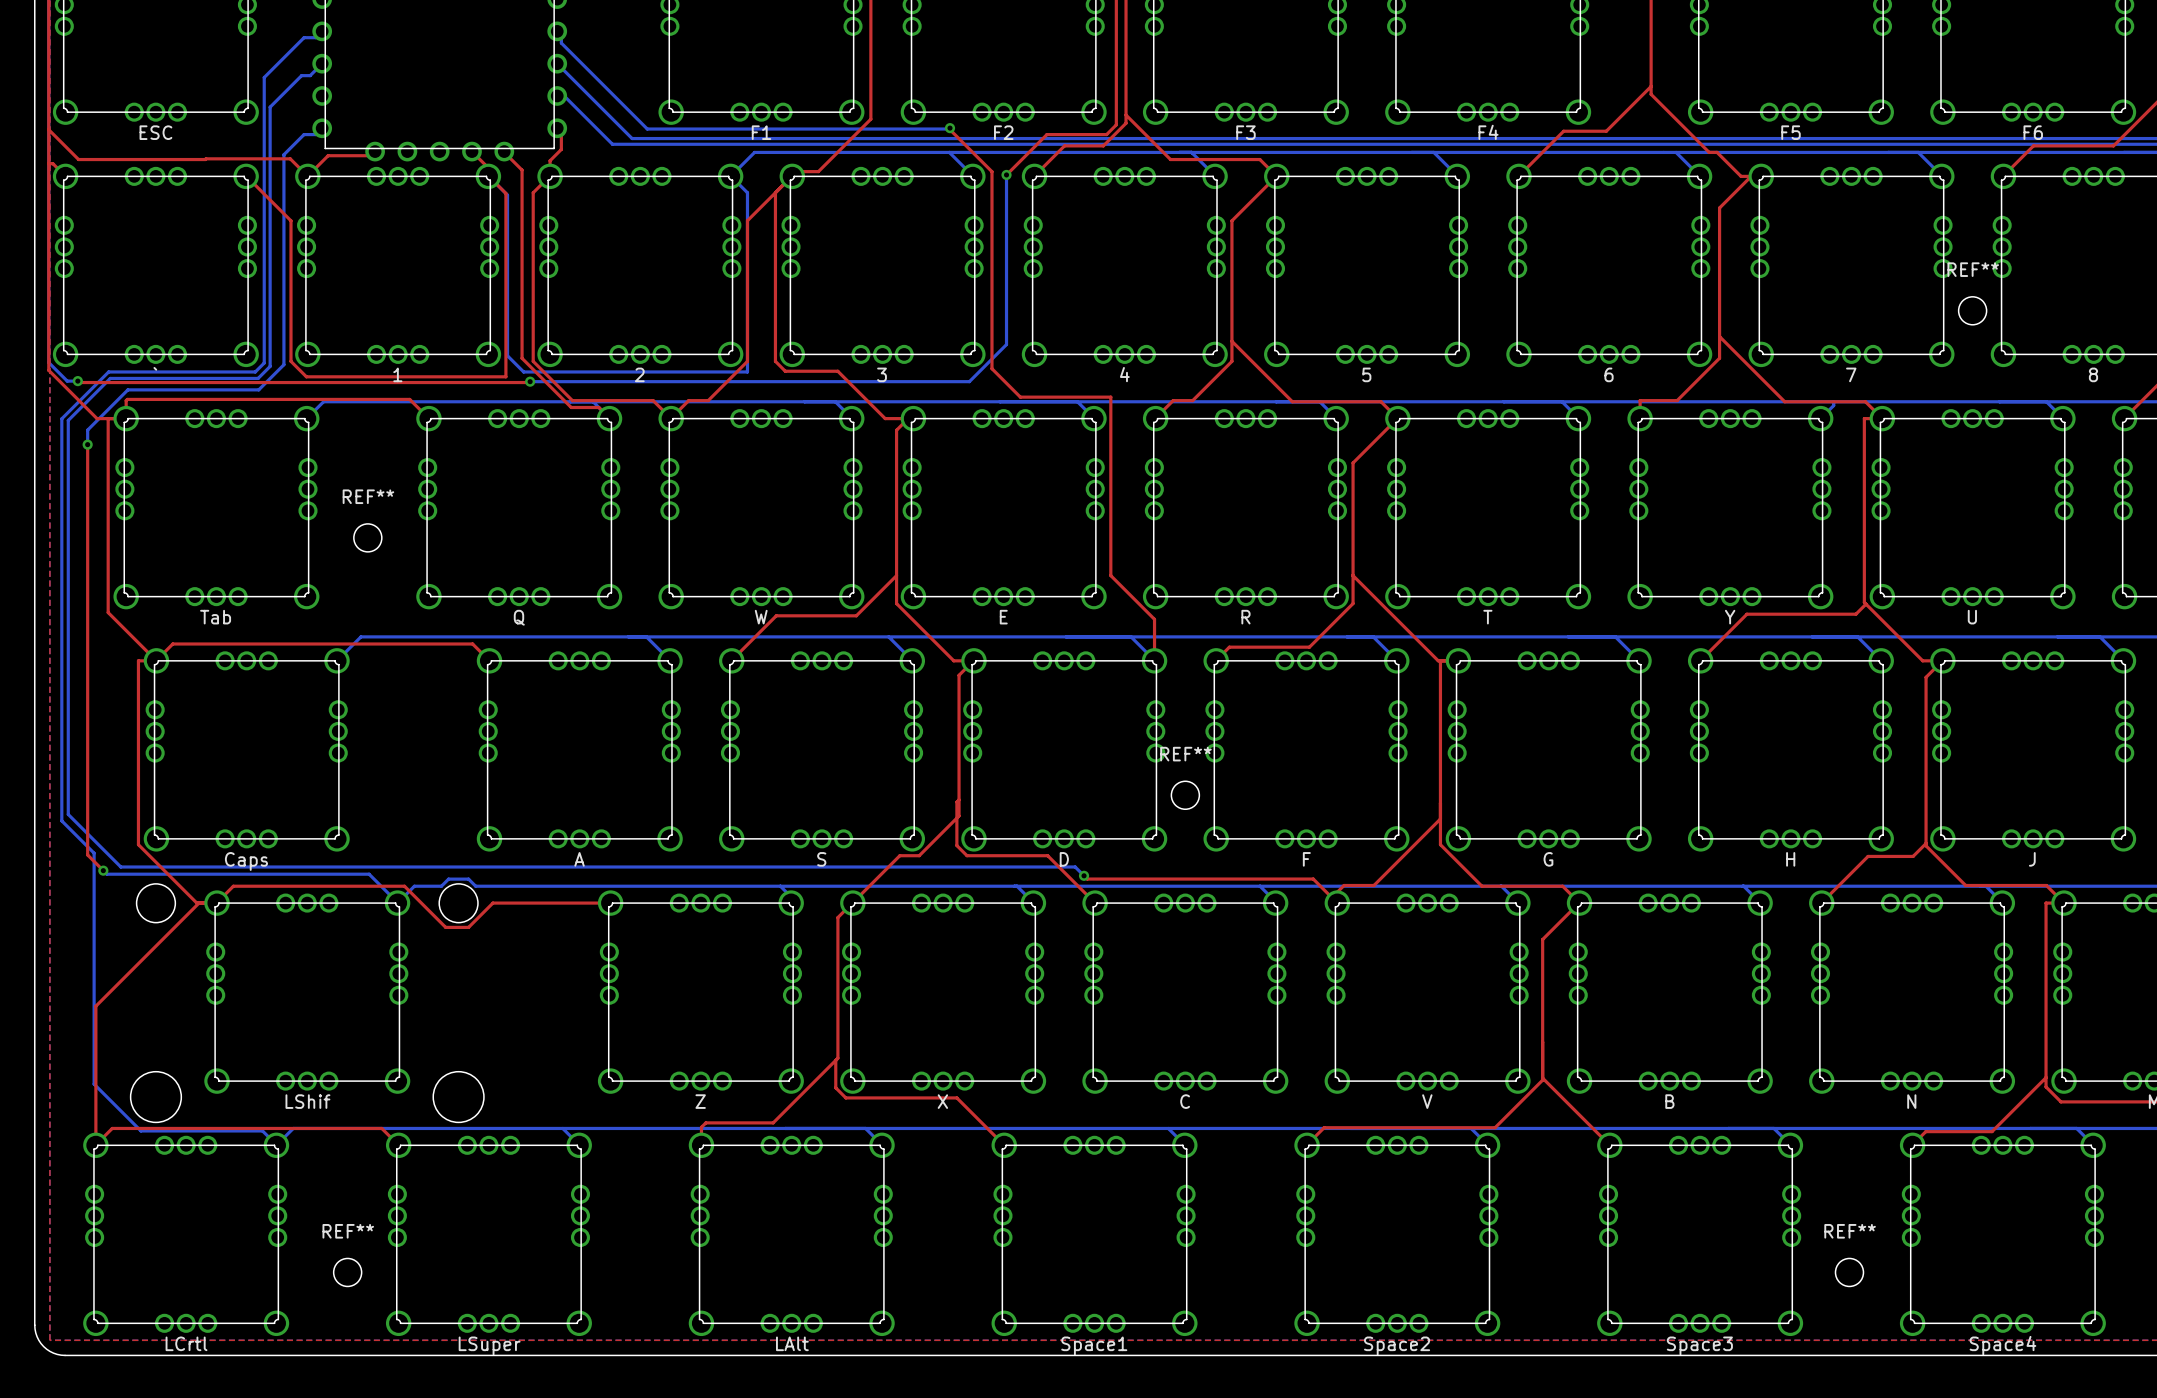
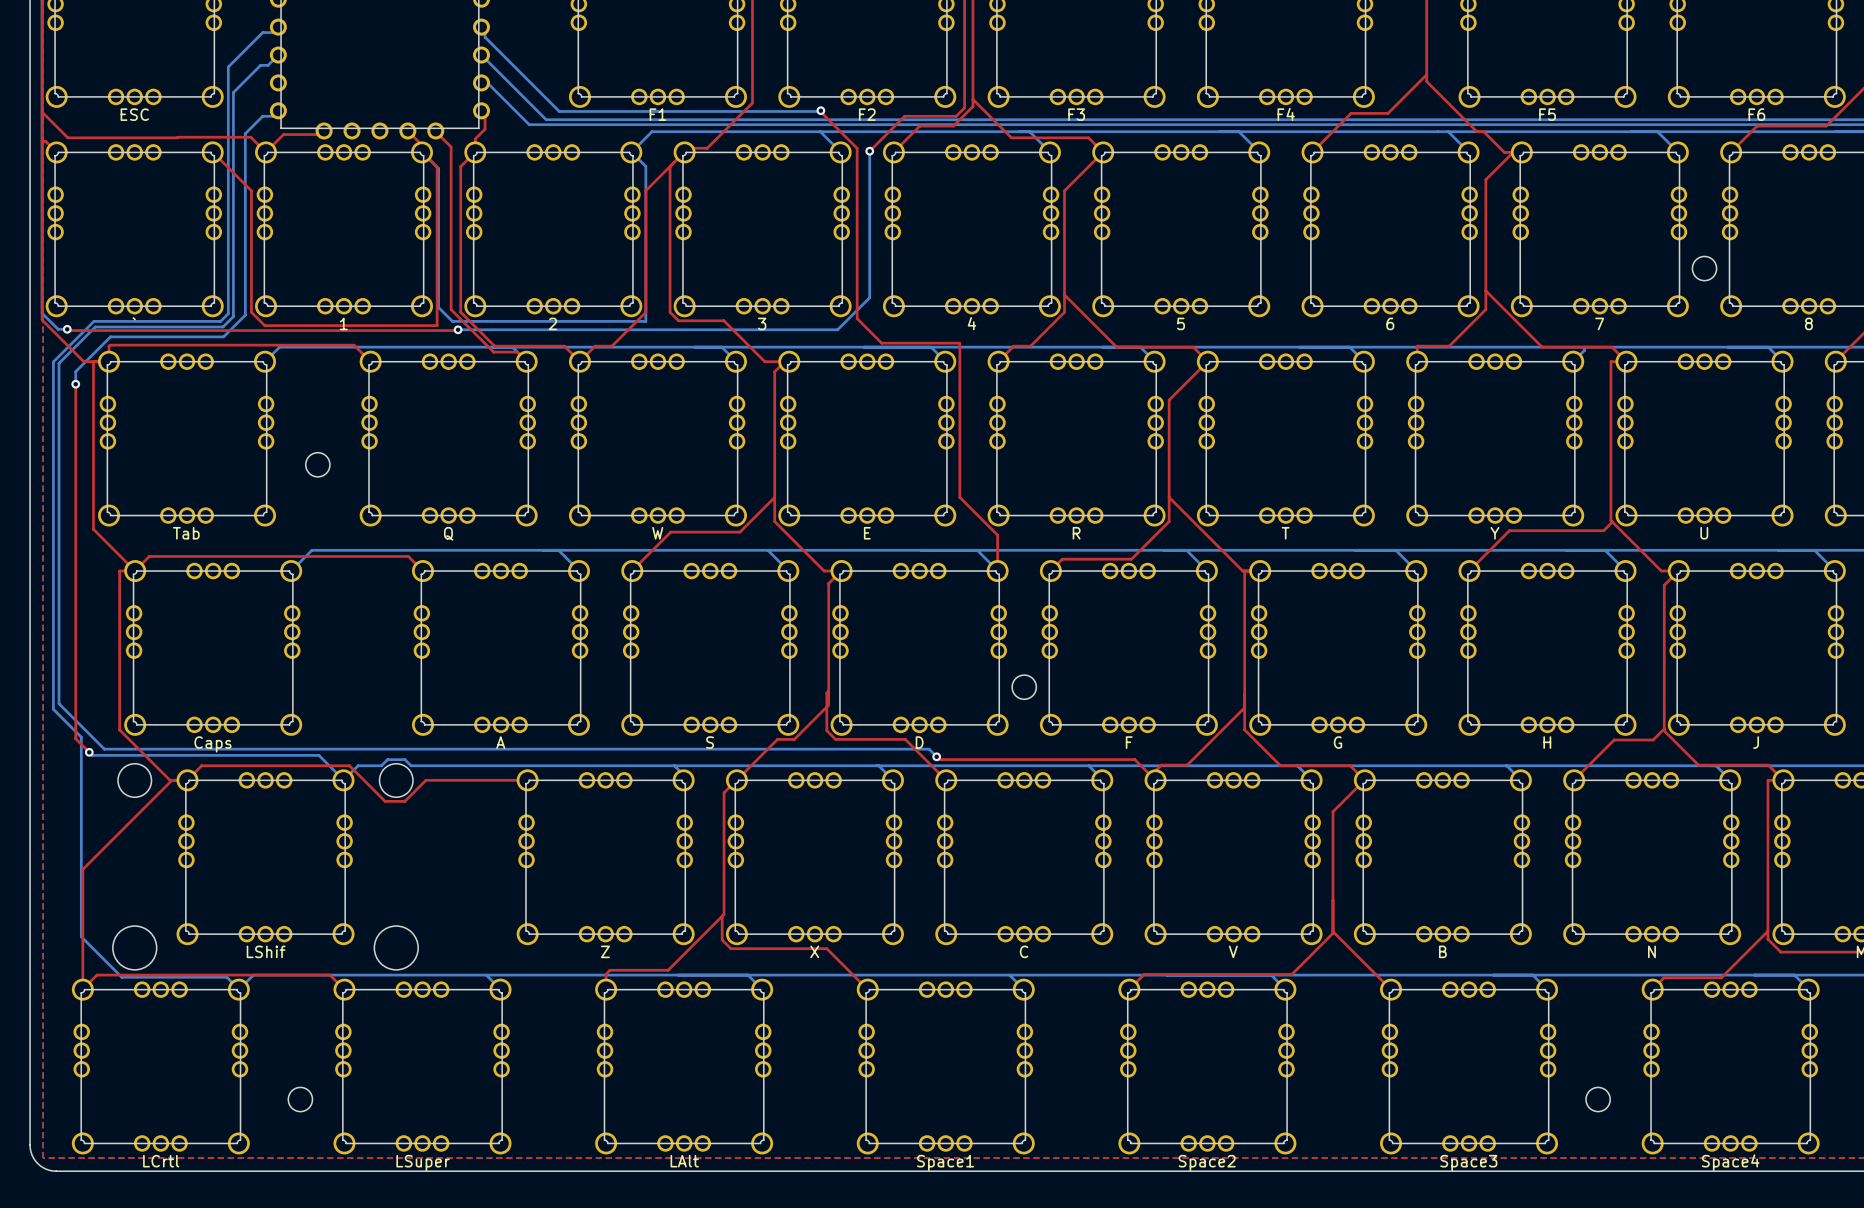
REF** name: REF** (1973, 269) -> none
REF** name: REF** (368, 496) -> none
REF** name: REF** (1185, 754) -> none
REF** name: REF** (348, 1231) -> none
REF** name: REF** (1850, 1231) -> none

